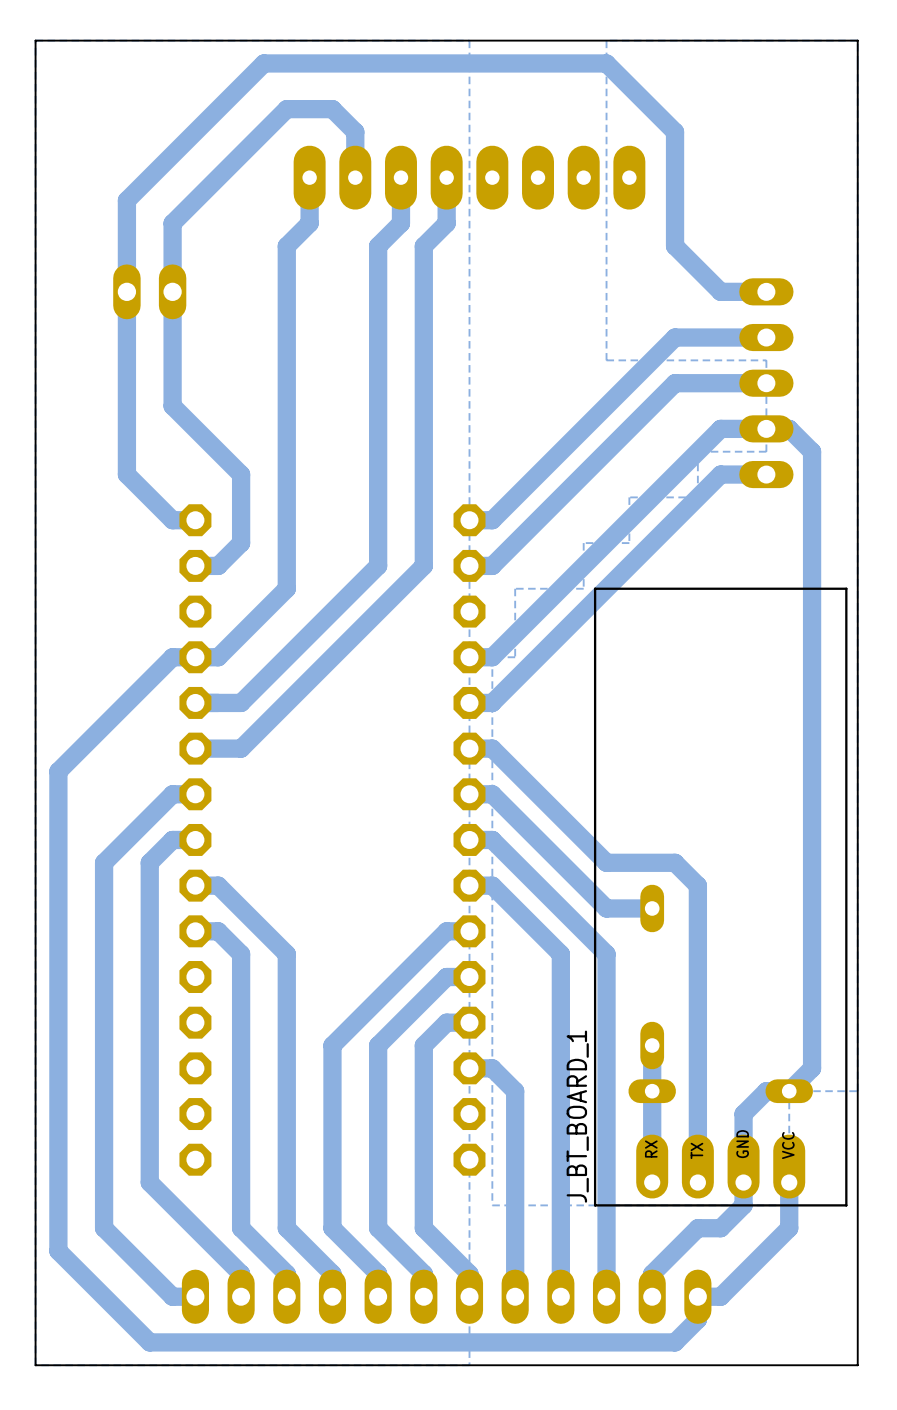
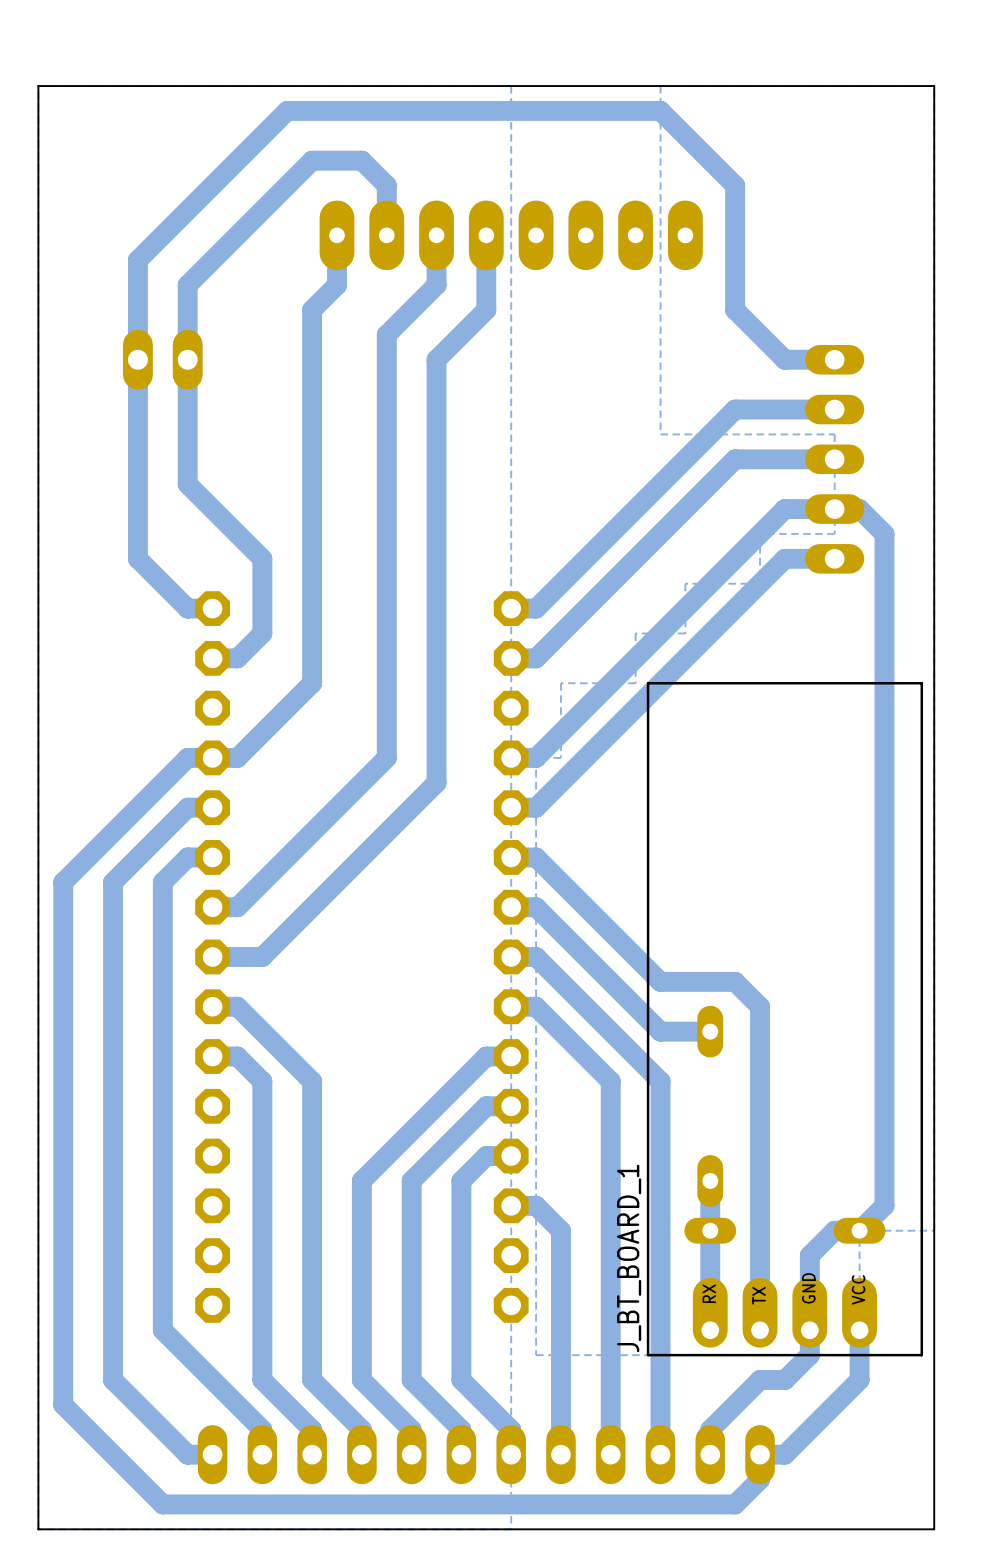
bottom track: (446, 223) (423, 246) (423, 565) (241, 748) (195, 748) -> (486, 285) (486, 309) (436, 359) (436, 782) (262, 956) (212, 956)
bottom track: (378, 246) (378, 565) (241, 702) (195, 702) -> (411, 309) (386, 334) (386, 757) (237, 907) (212, 907)
bottom track: (195, 794) (172, 794) (104, 862) -> (212, 807) (187, 807) (113, 882) (113, 981)
bottom track: (195, 839) (172, 839) (149, 862) -> (212, 857) (187, 857) (162, 882) (162, 981)

